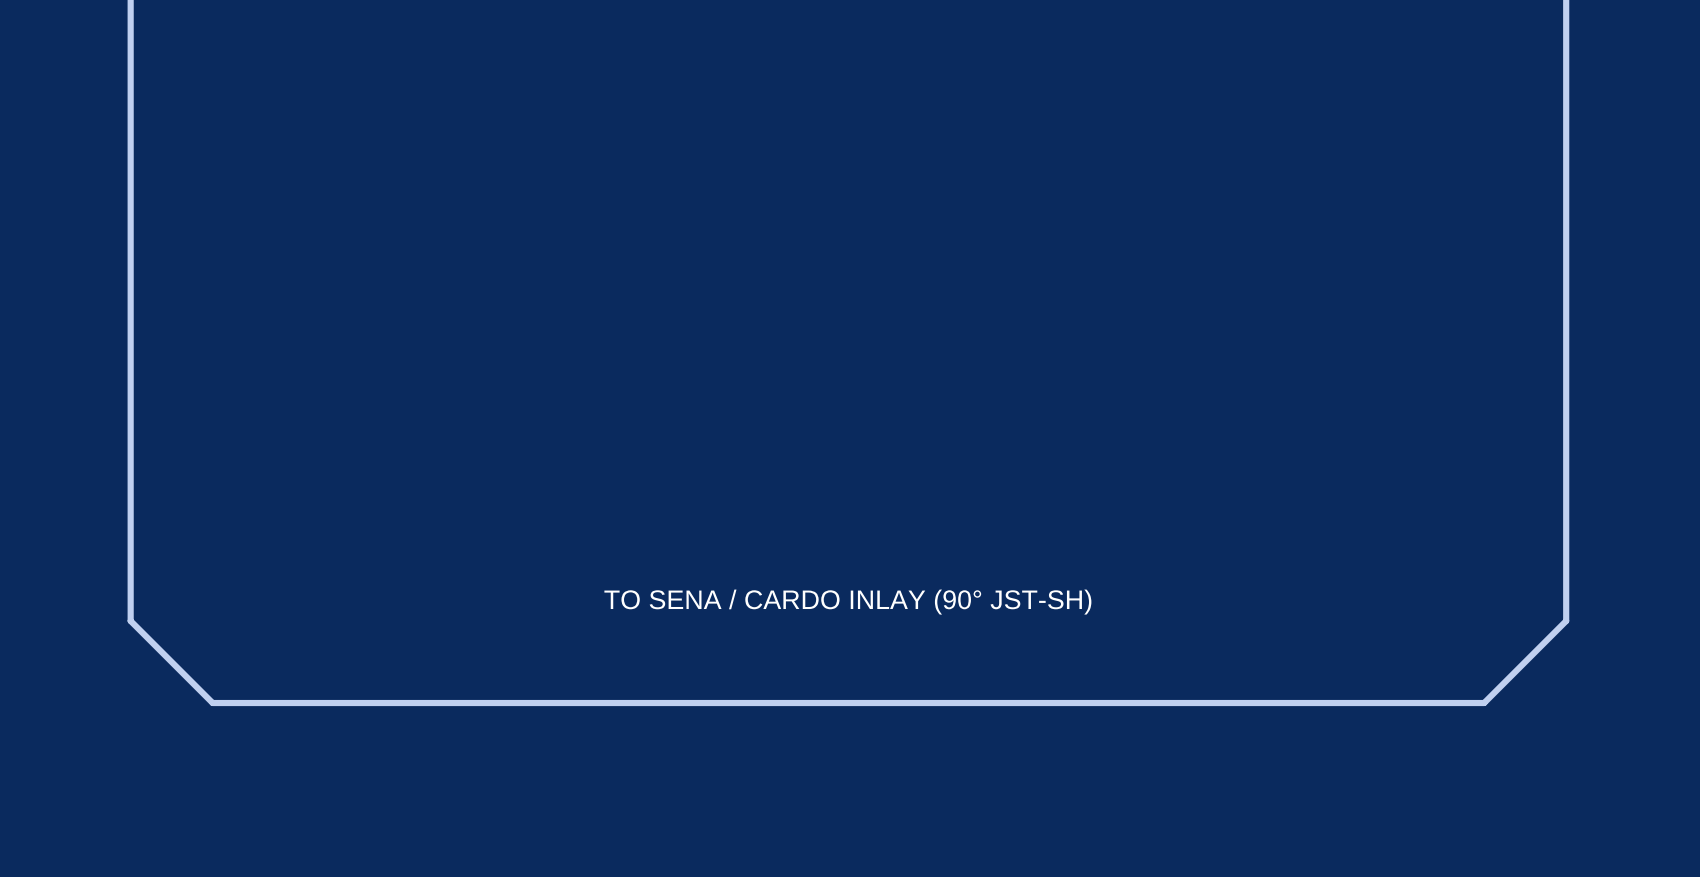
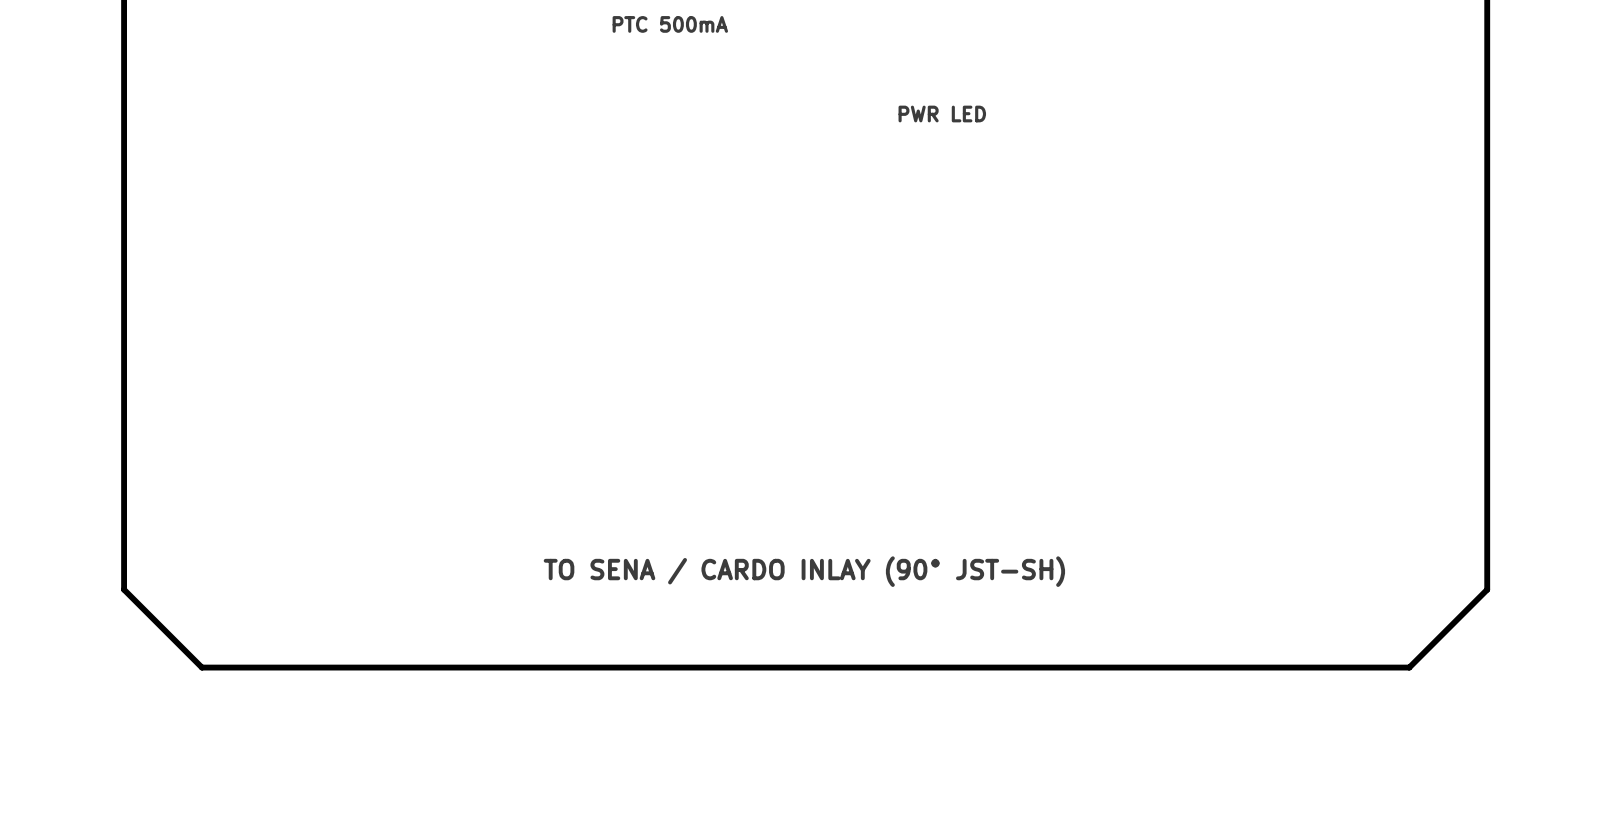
text: none -> PTC 500mA (670, 24)
text: none -> PWR LED (942, 114)

